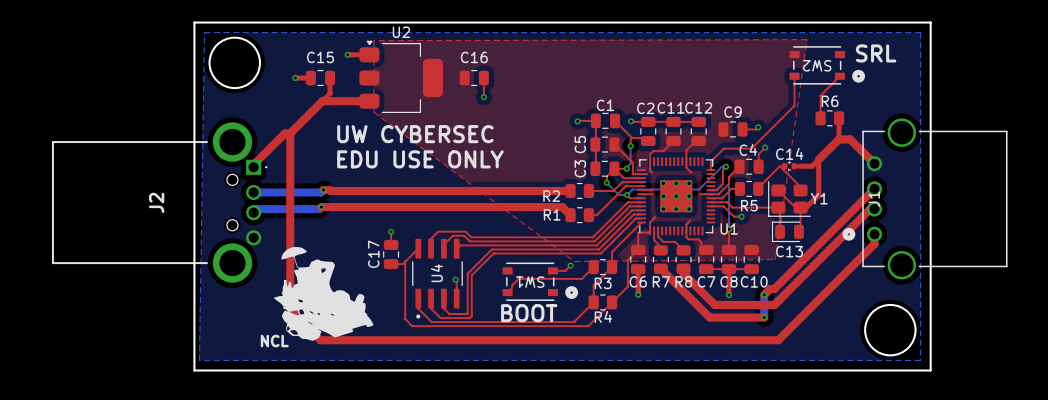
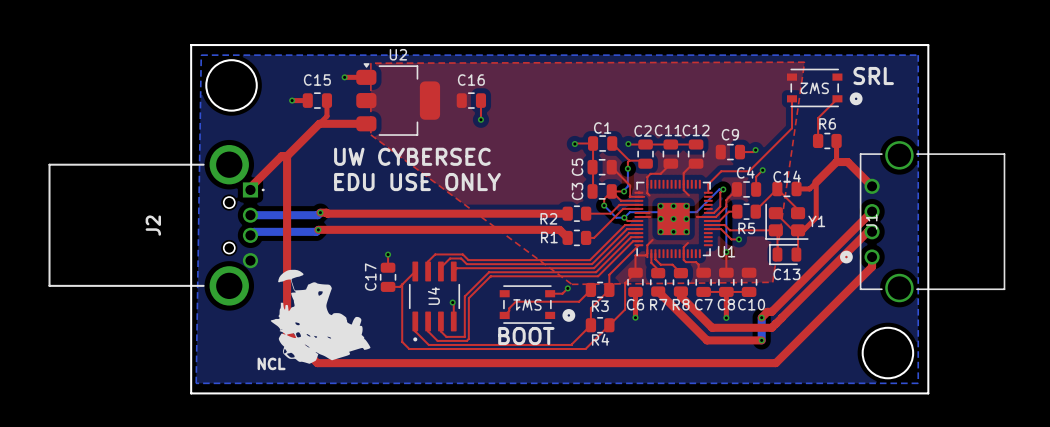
C14 footprint: [781, 162, 798, 171] -> [772, 180, 802, 197]

